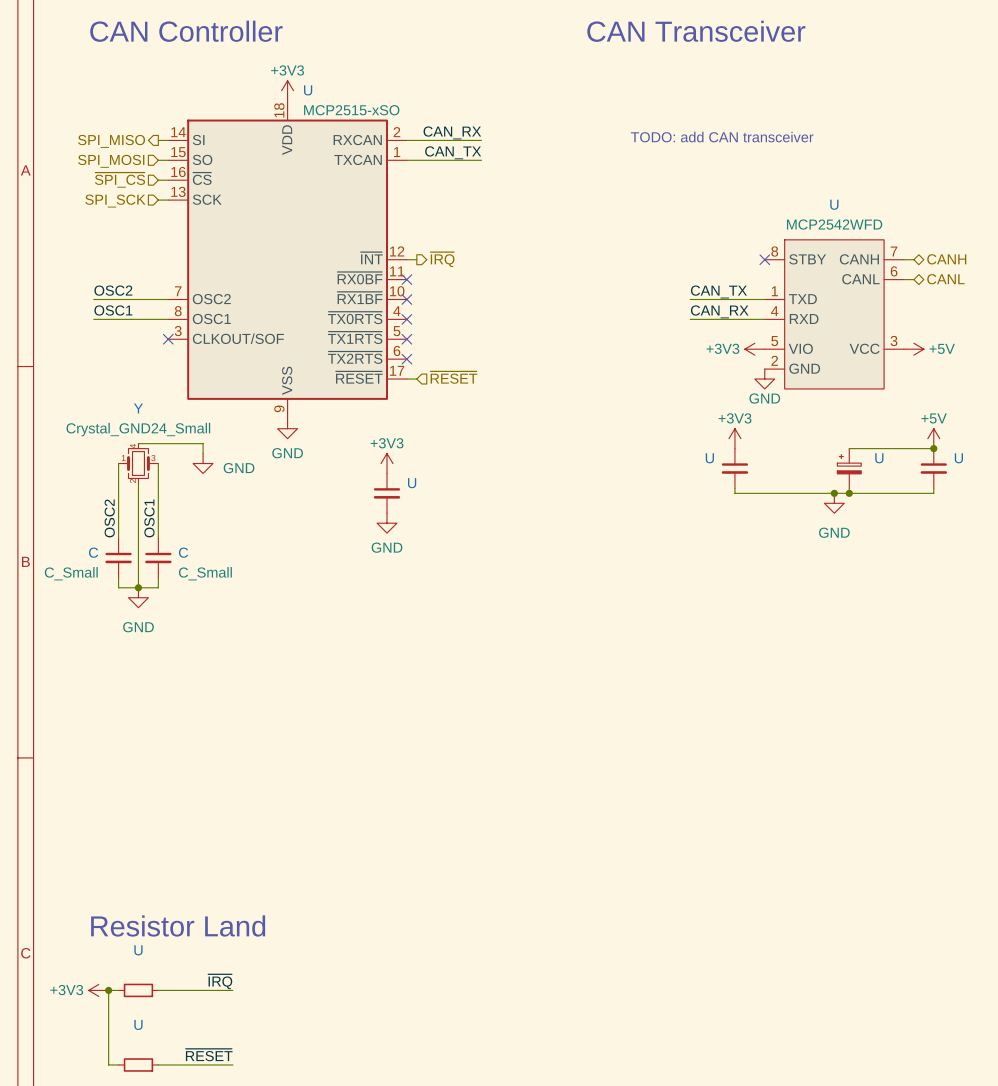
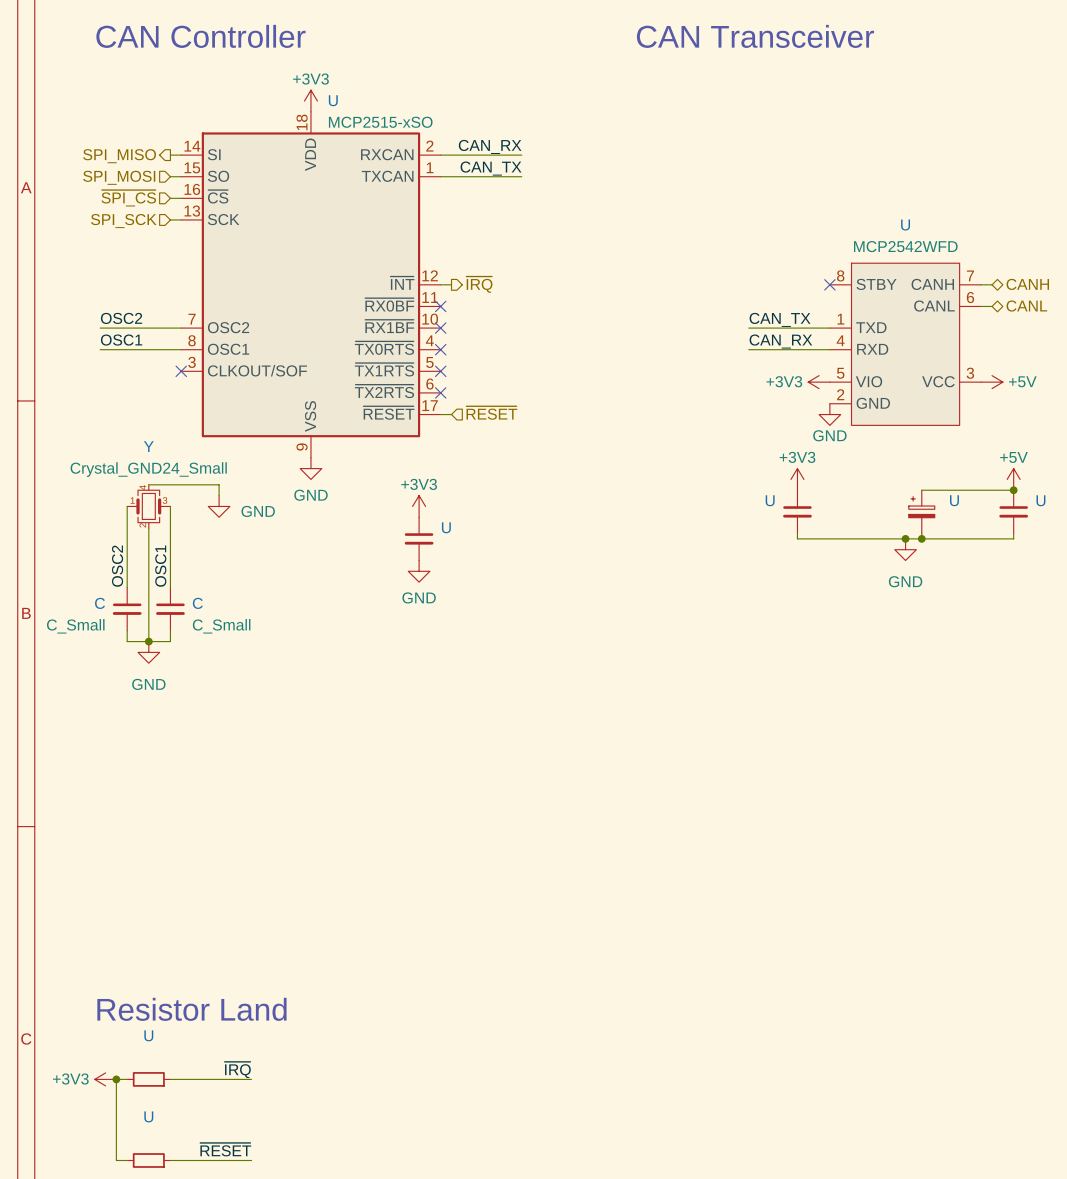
text: TODO: add CAN transceiver (722, 137) -> none

